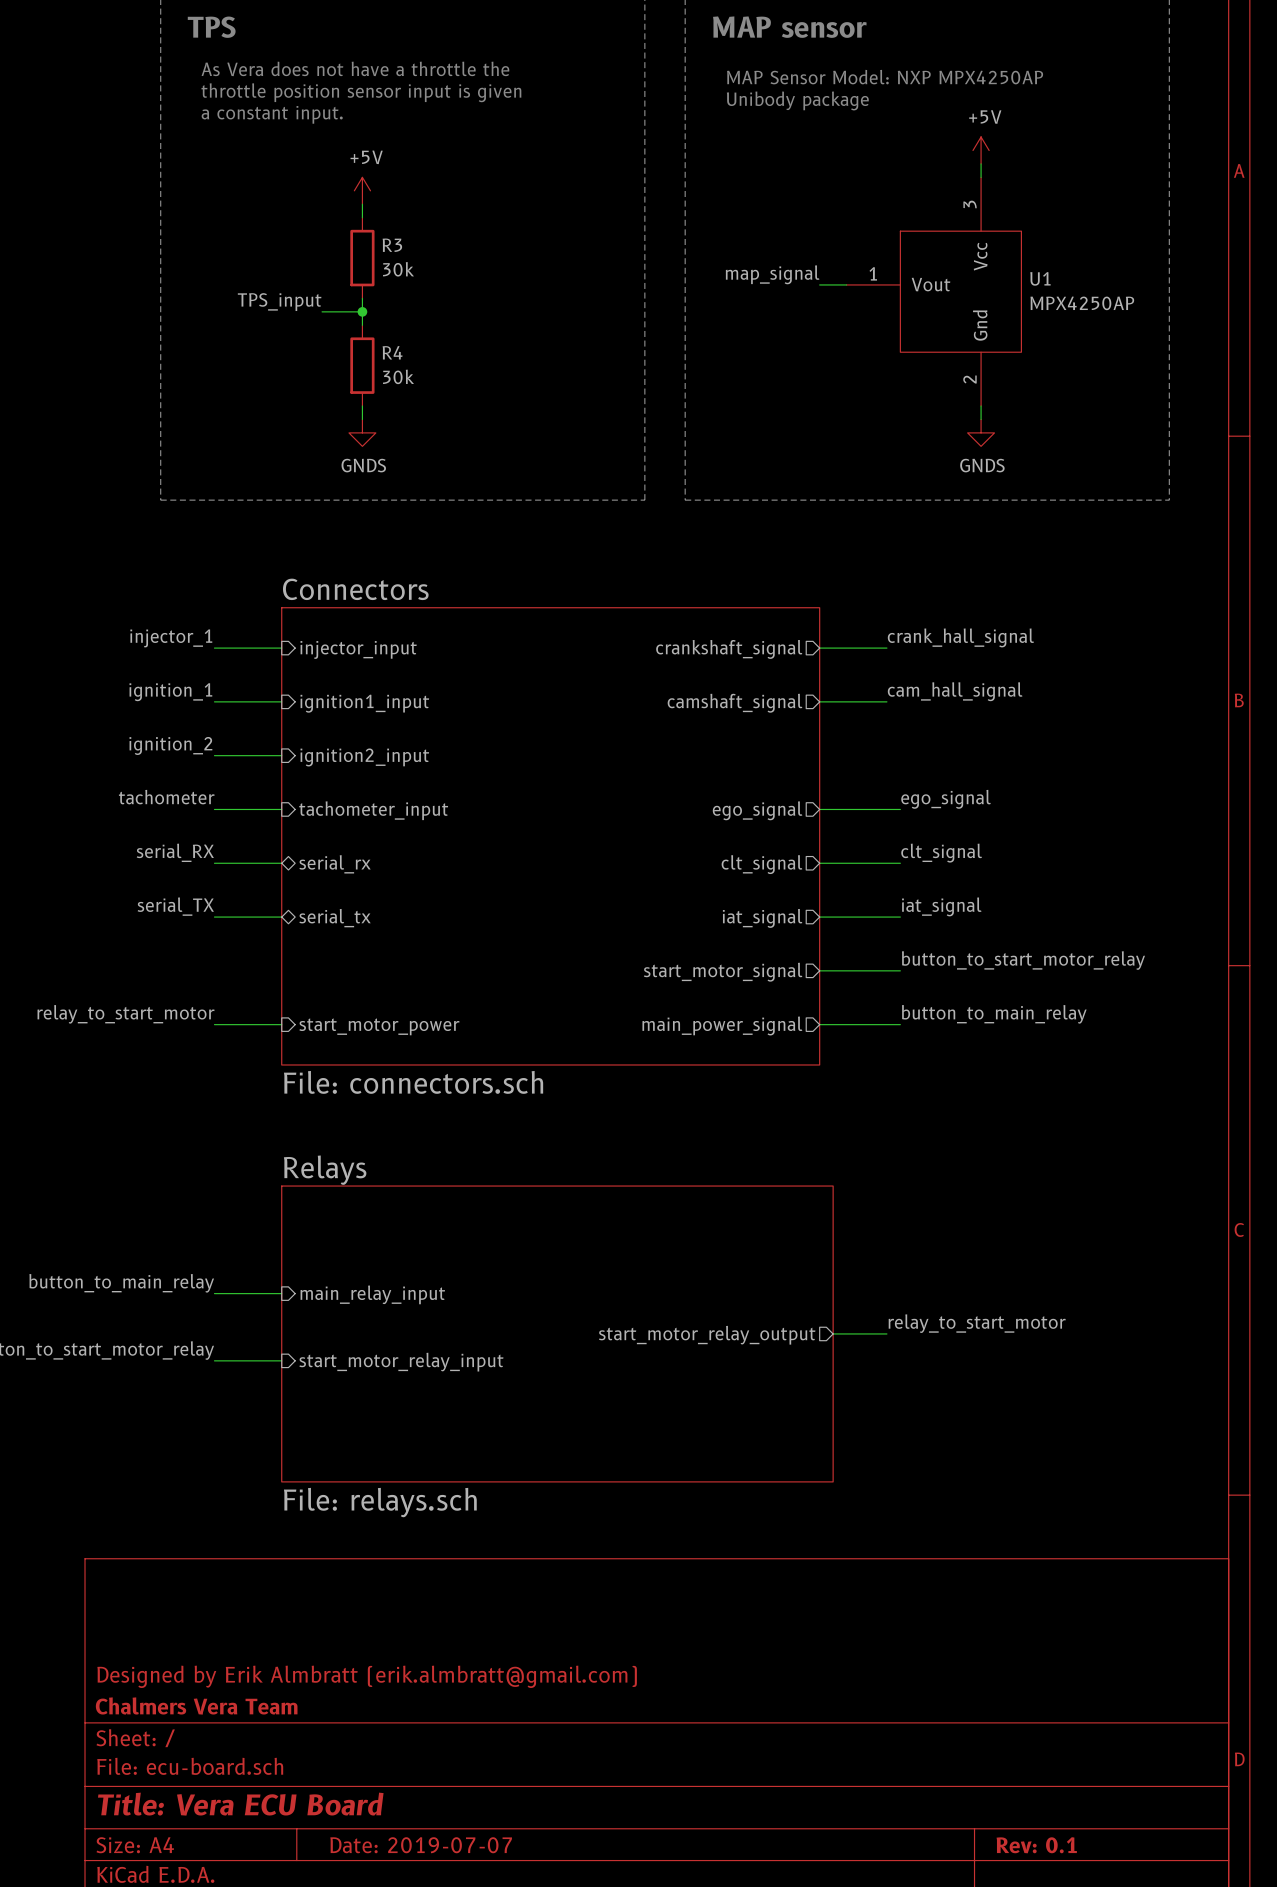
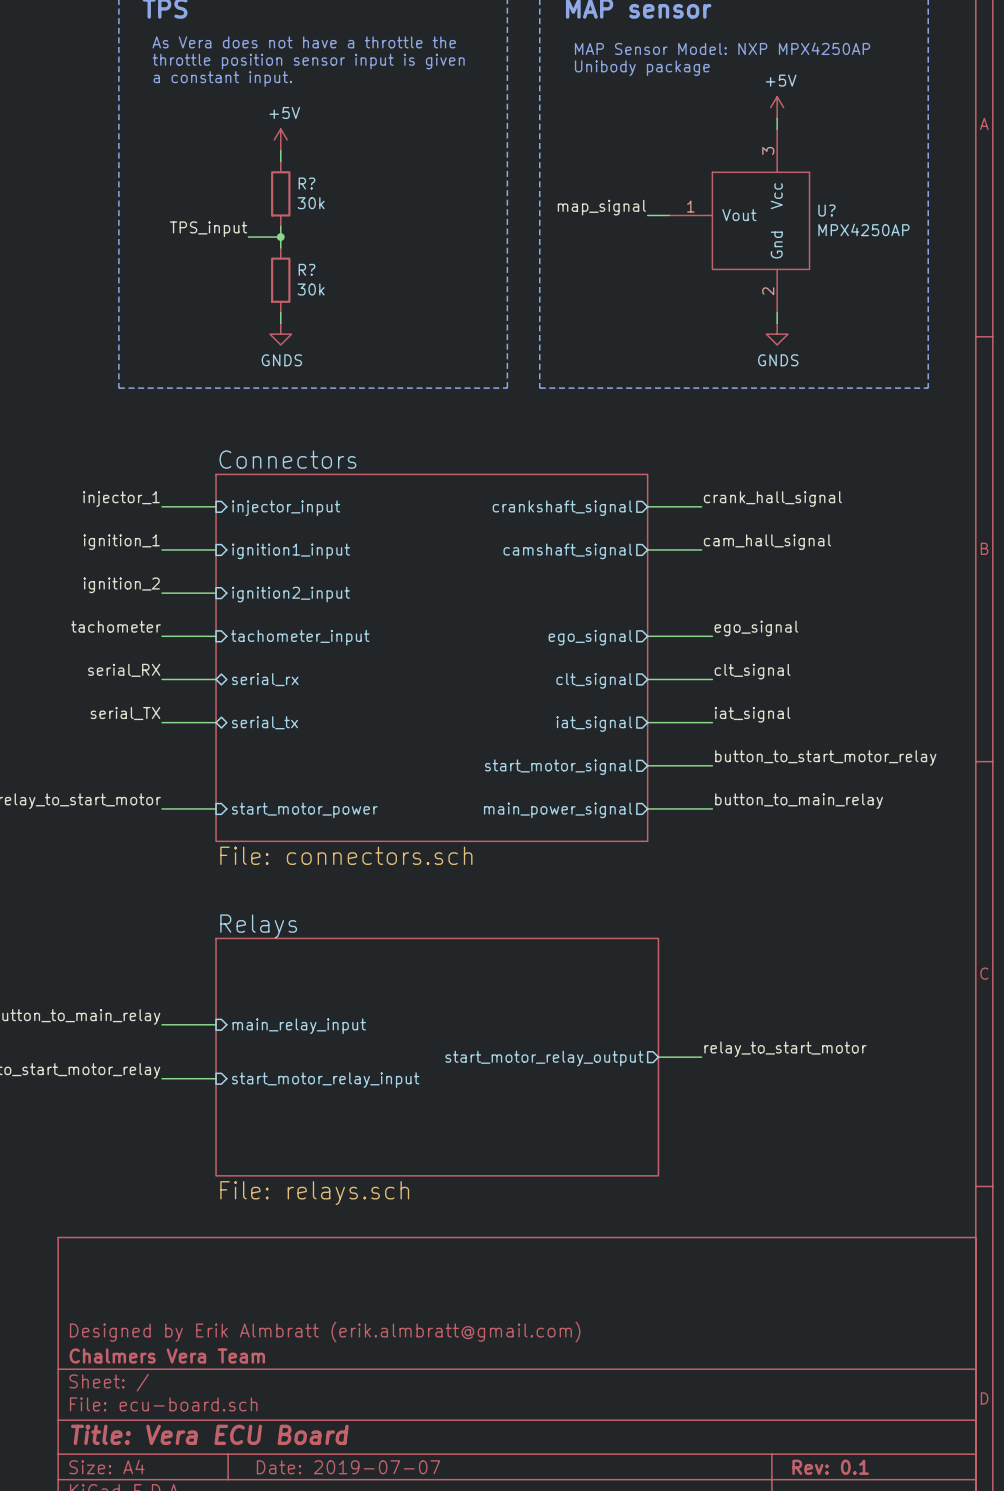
R3 name: R3 (392, 245) -> R? (307, 183)
U1 name: U1 (1040, 278) -> U? (826, 210)
R4 name: R4 (392, 352) -> R? (307, 269)

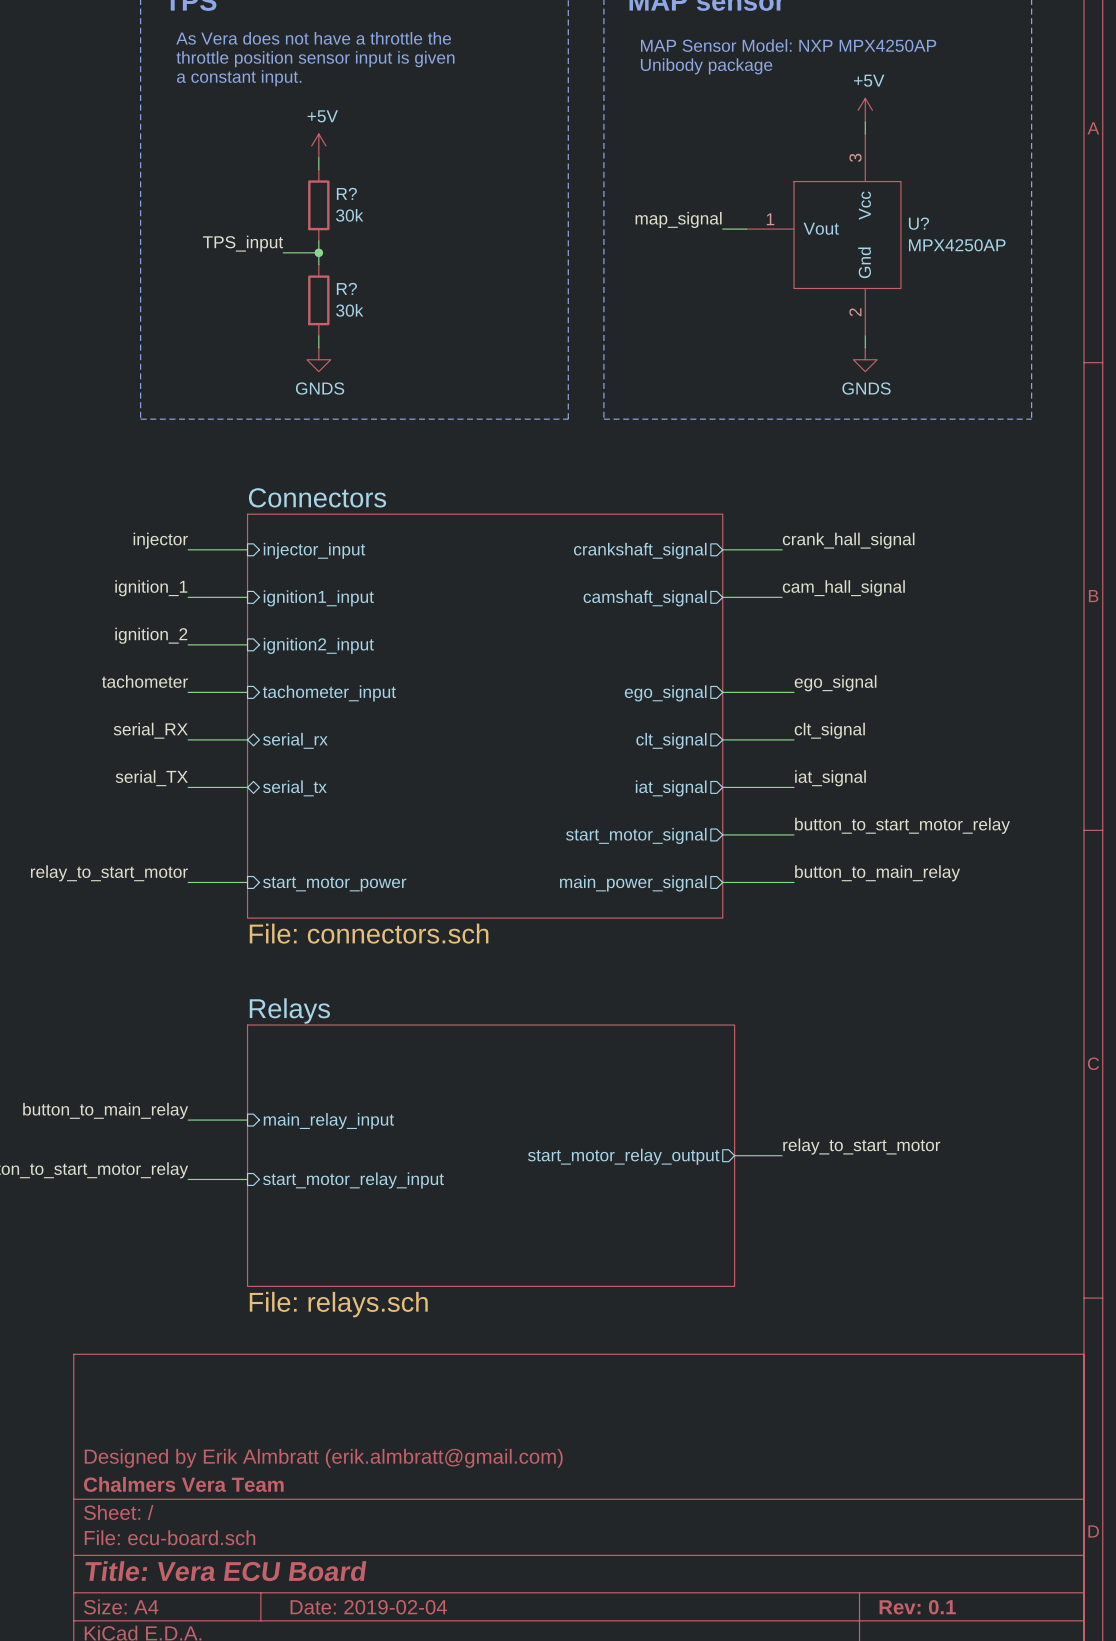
label: injector_1 (121, 498) -> injector (160, 540)
title block: Date: 2019-07-07 (348, 1467) -> Date: 2019-02-04 (368, 1607)

